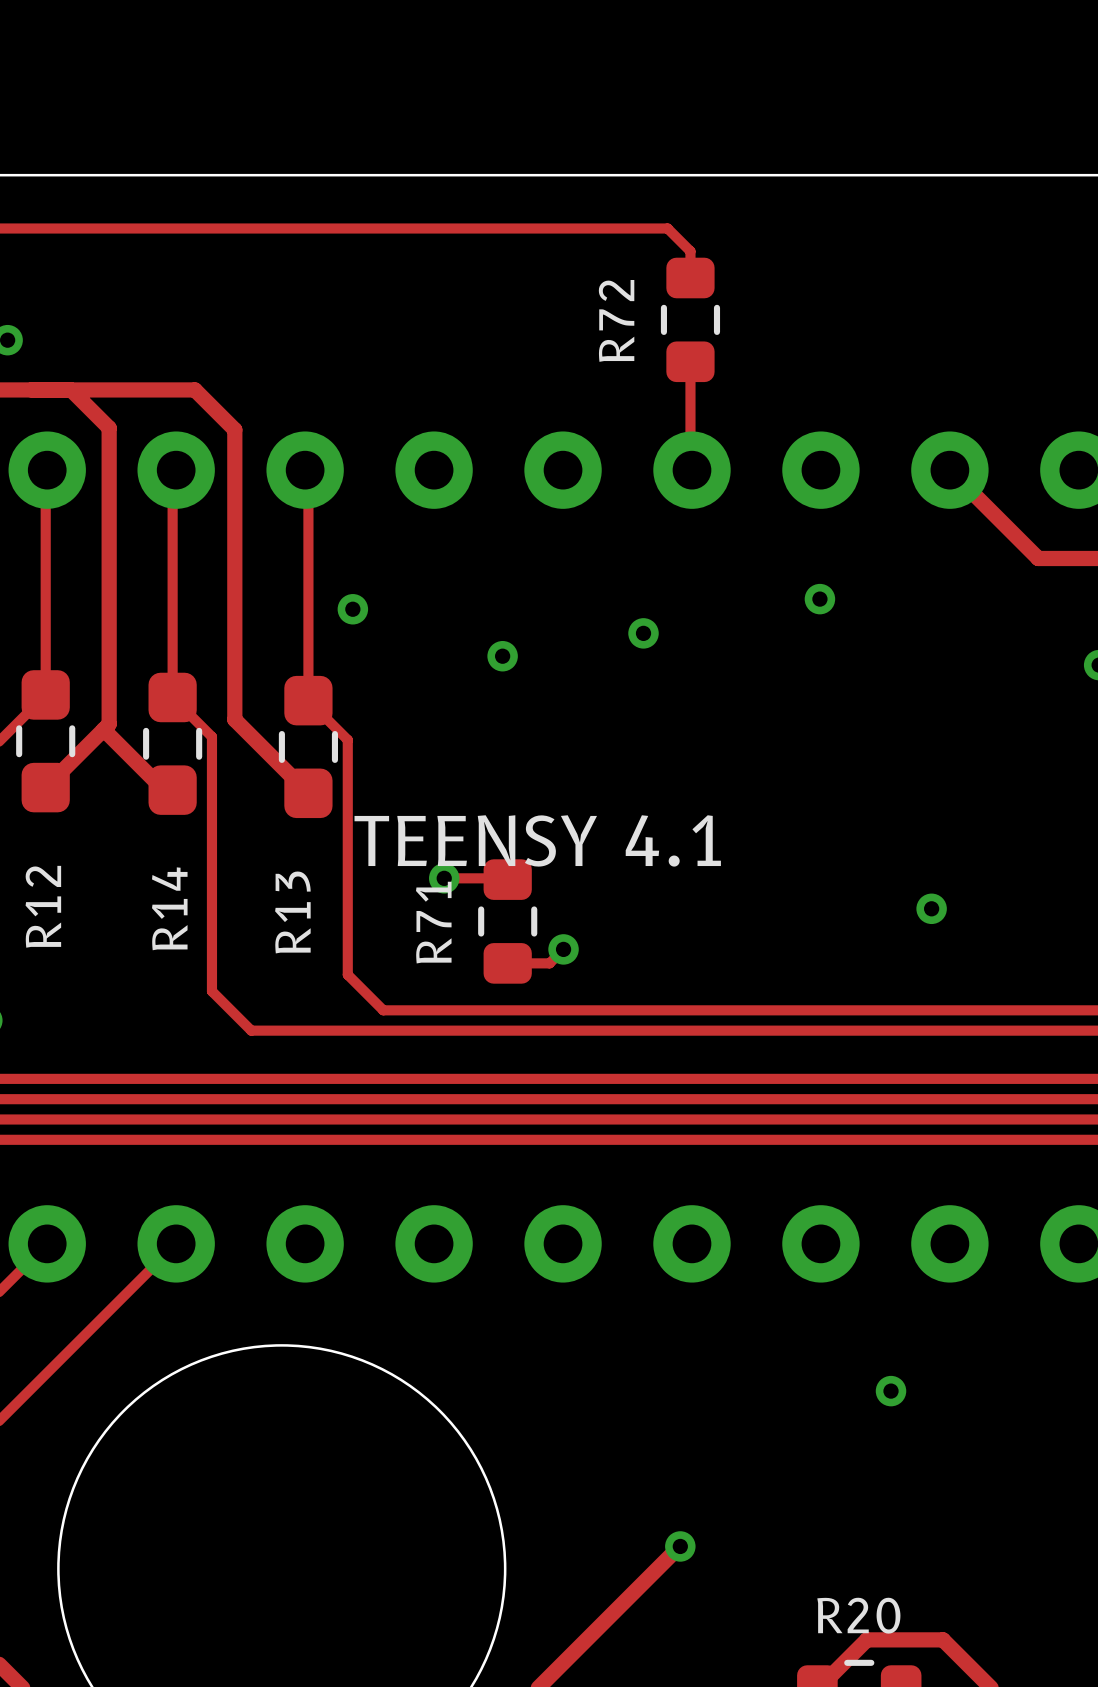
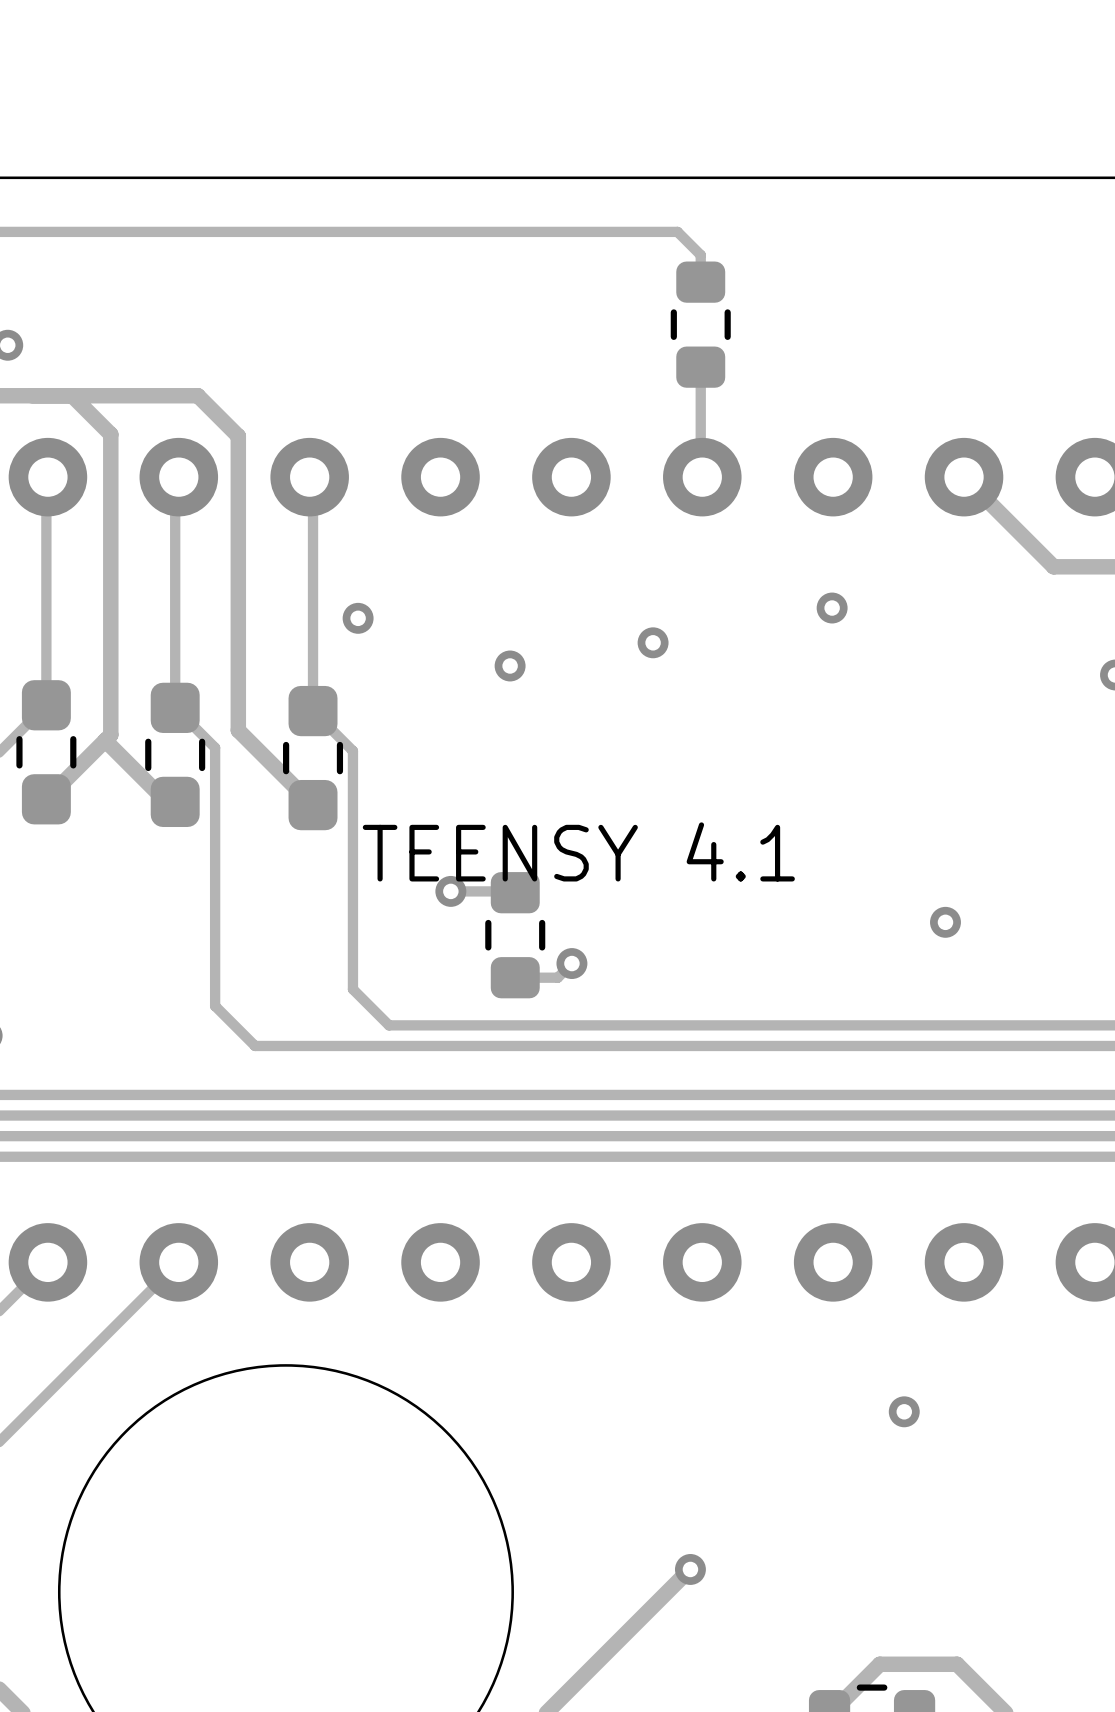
R72 name: R72 (616, 320) -> none
R12 name: R12 (43, 906) -> none
R14 name: R14 (169, 908) -> none
R13 name: R13 (292, 912) -> none
R71 name: R71 (433, 922) -> none
R20 name: R20 (858, 1615) -> none

